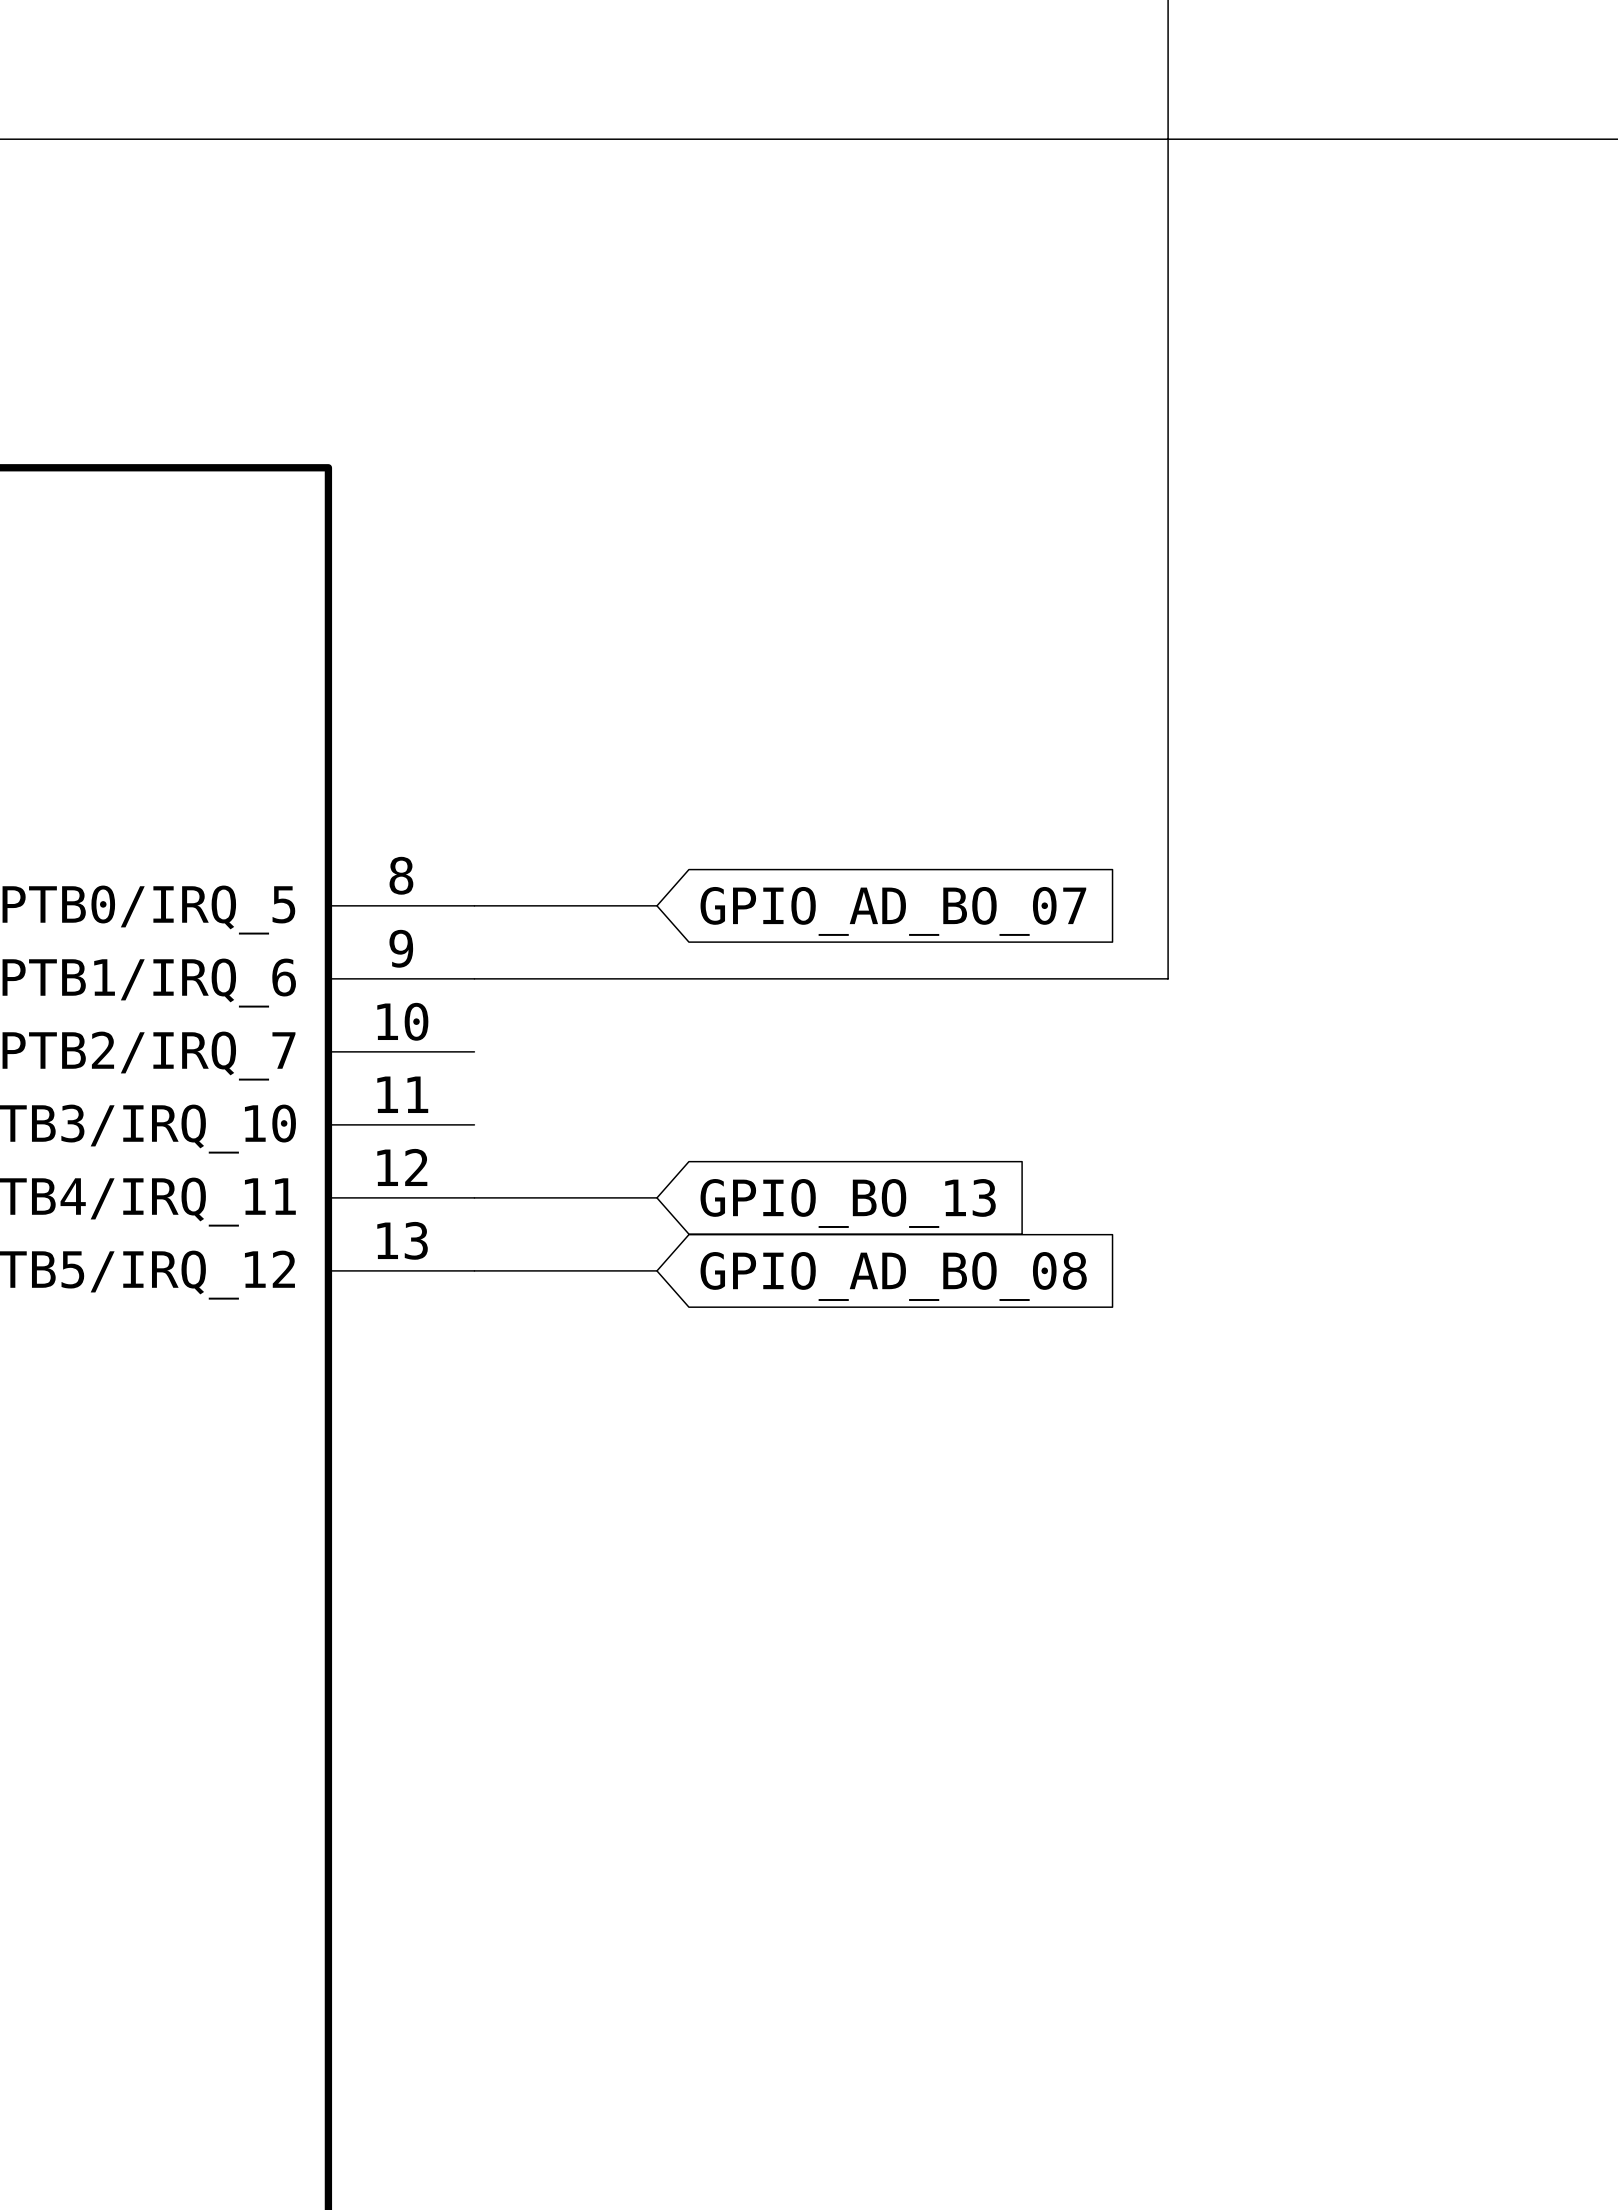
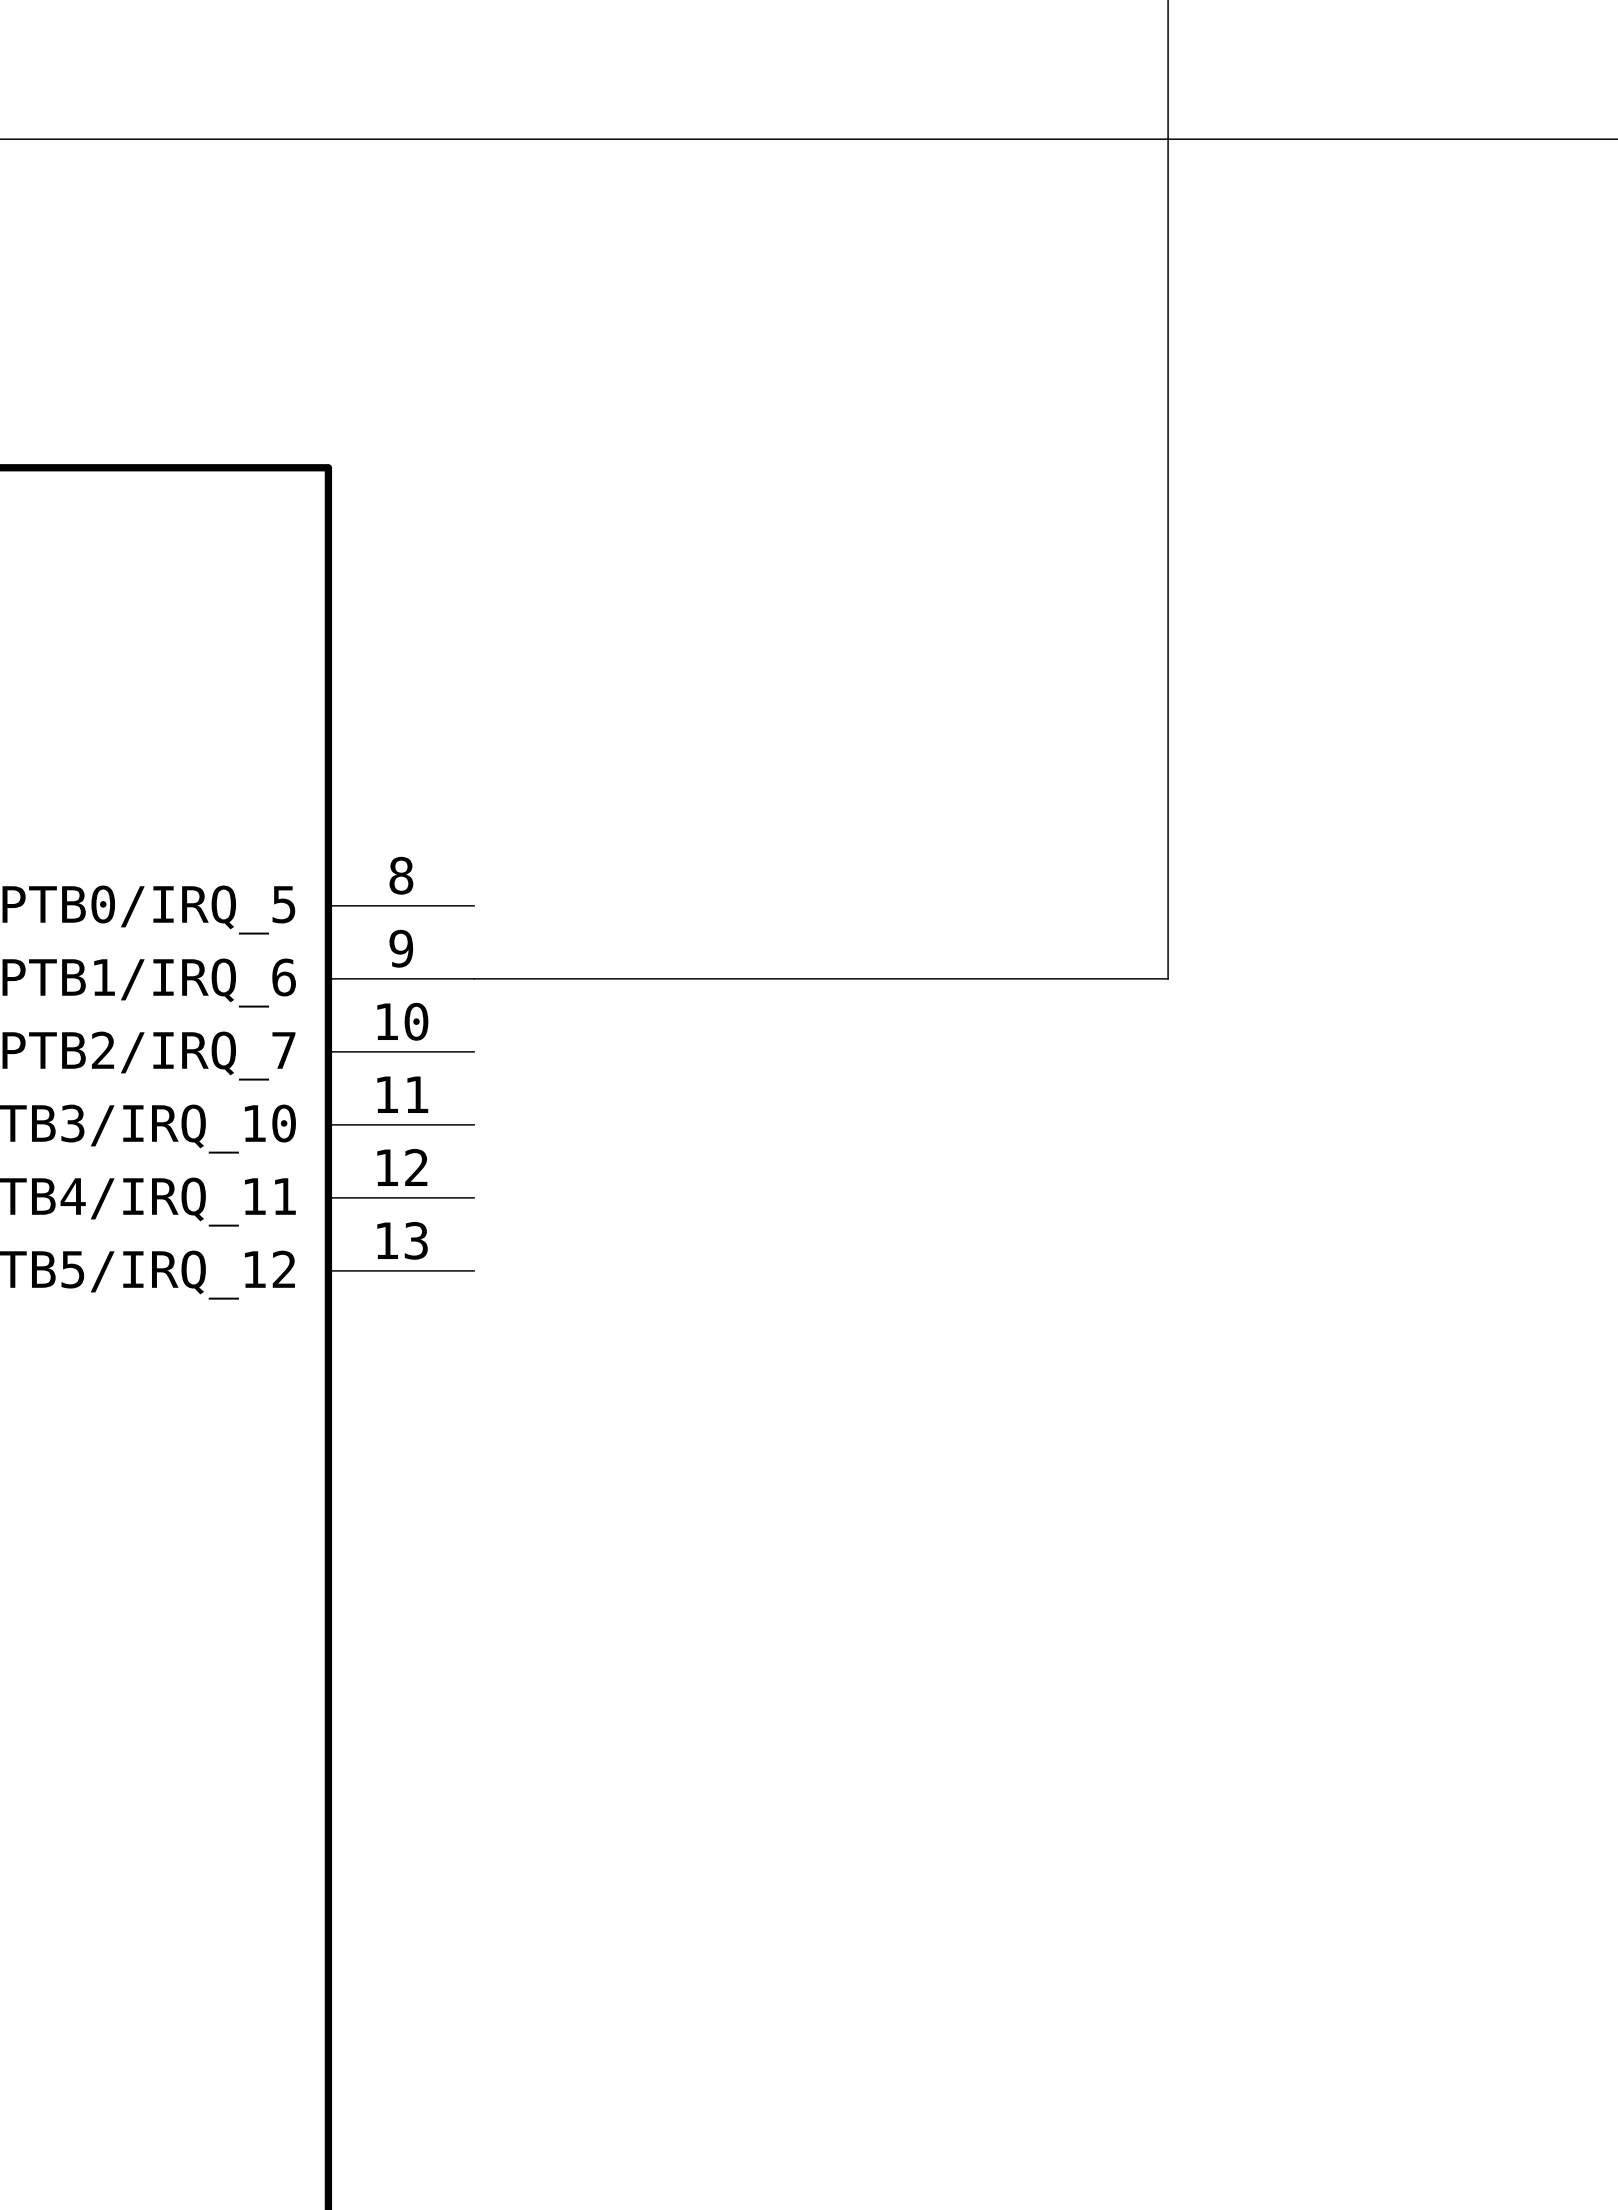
wire: (474, 905) (656, 905) -> none
global label: GPIO_AD_BO_07 (893, 911) -> none
wire: (474, 1197) (656, 1197) -> none
global label: GPIO_BO_13 (848, 1203) -> none
wire: (474, 1270) (656, 1270) -> none
global label: GPIO_AD_BO_08 (893, 1276) -> none

